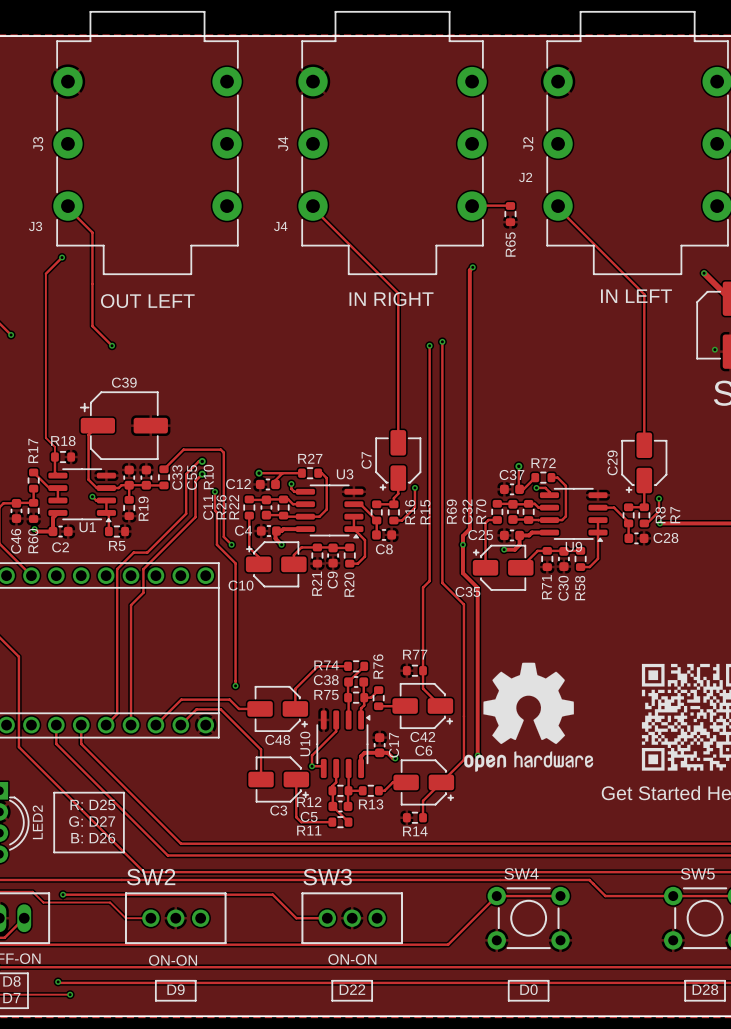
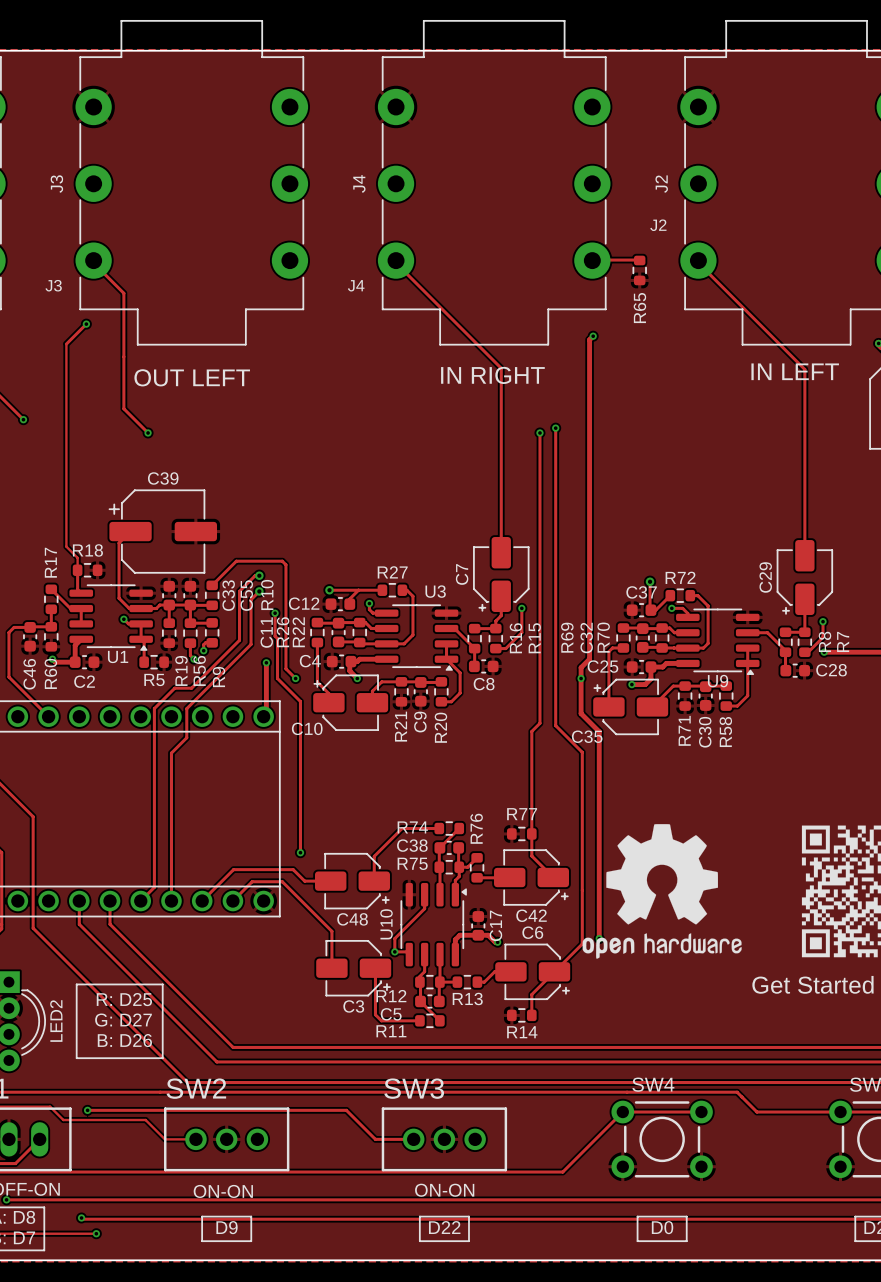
track: none -> (190, 605) (190, 623)
track: none -> (212, 622) (190, 623)
R56: none -> (190, 633)
R9: none -> (212, 632)
R19 name position: R19 (143, 508) -> R19 (181, 670)
track: none -> (212, 642) (205, 642) (203, 650)
track: none -> (190, 643) (190, 655) (194, 659)
via: none -> (203, 650)
via: none -> (194, 659)
track: none -> (266, 662) (266, 713)
via: none -> (266, 662)

